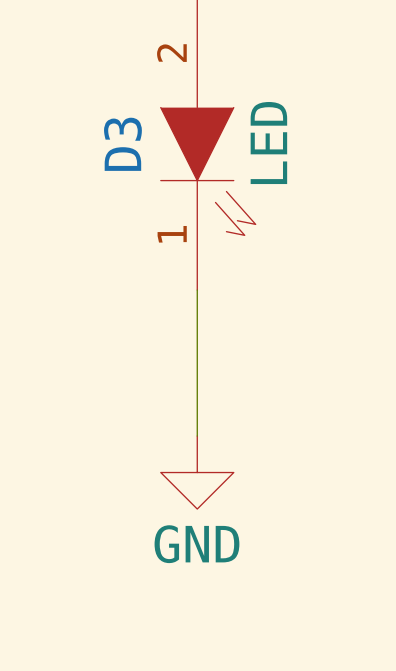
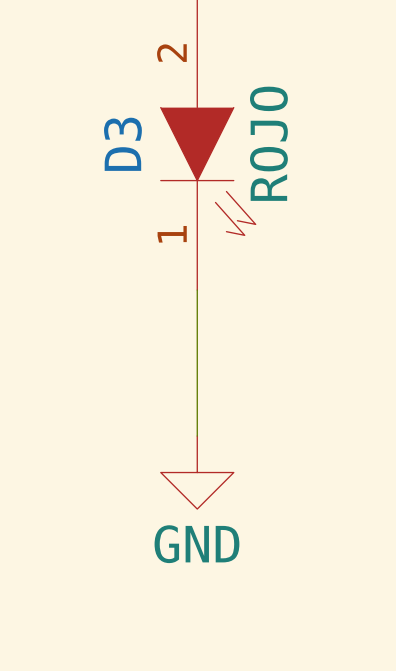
D3 value: LED (268, 143) -> ROJO (268, 143)

